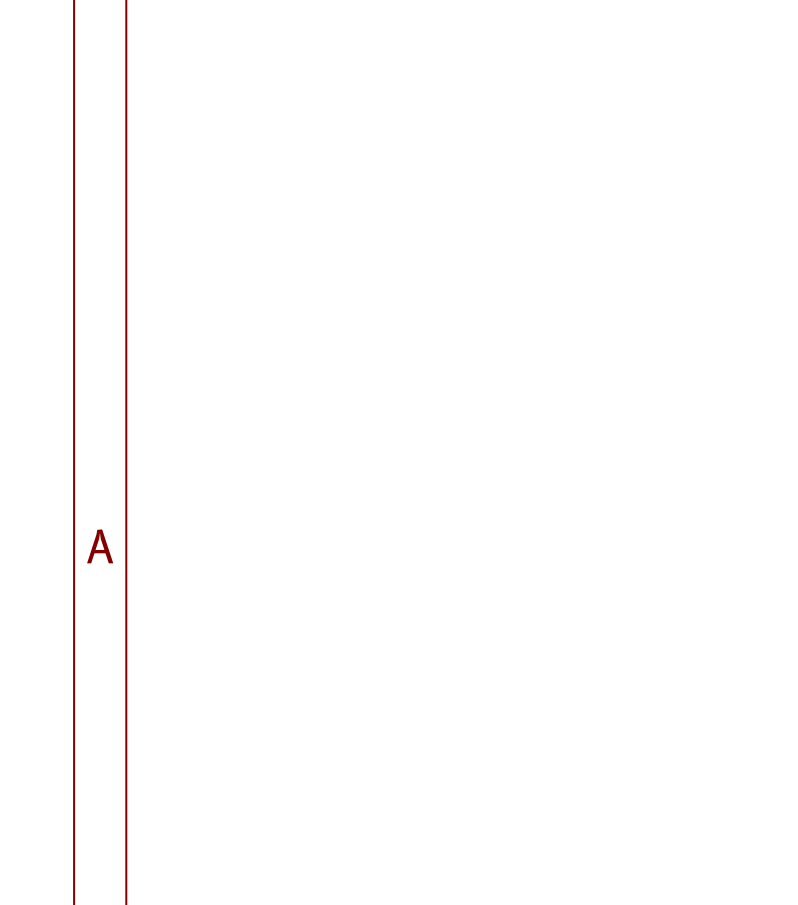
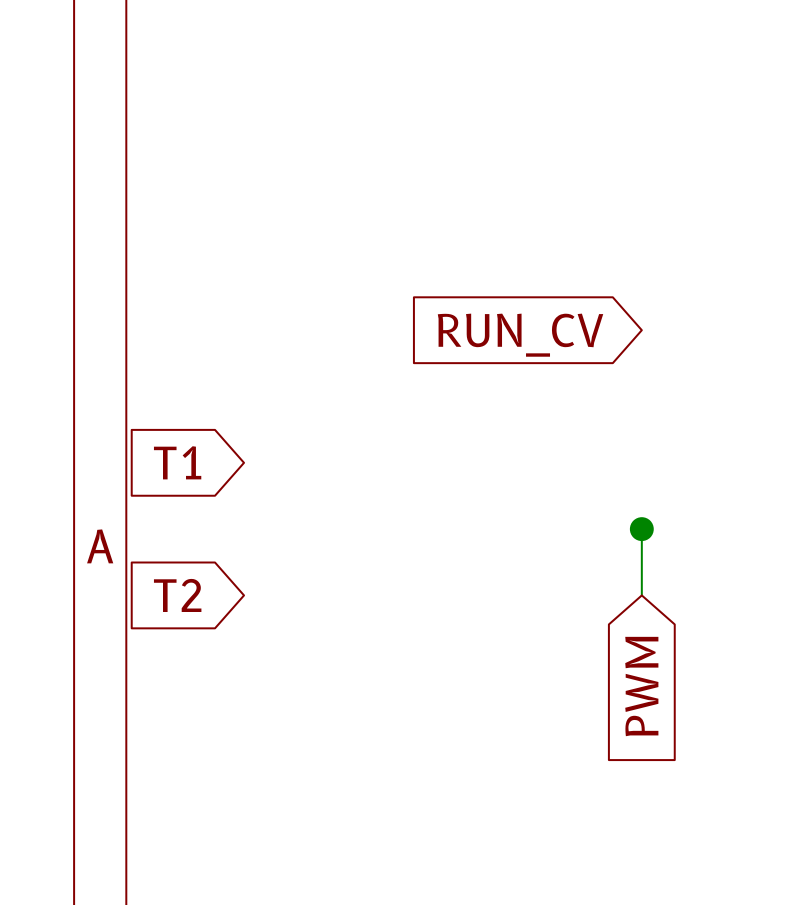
global label: none -> RUN_CV (520, 335)
global label: none -> T1 (177, 462)
wire: none -> (641, 529) (641, 595)
junction: none -> (641, 529)
global label: none -> T2 (177, 595)
global label: none -> PWM (641, 686)

